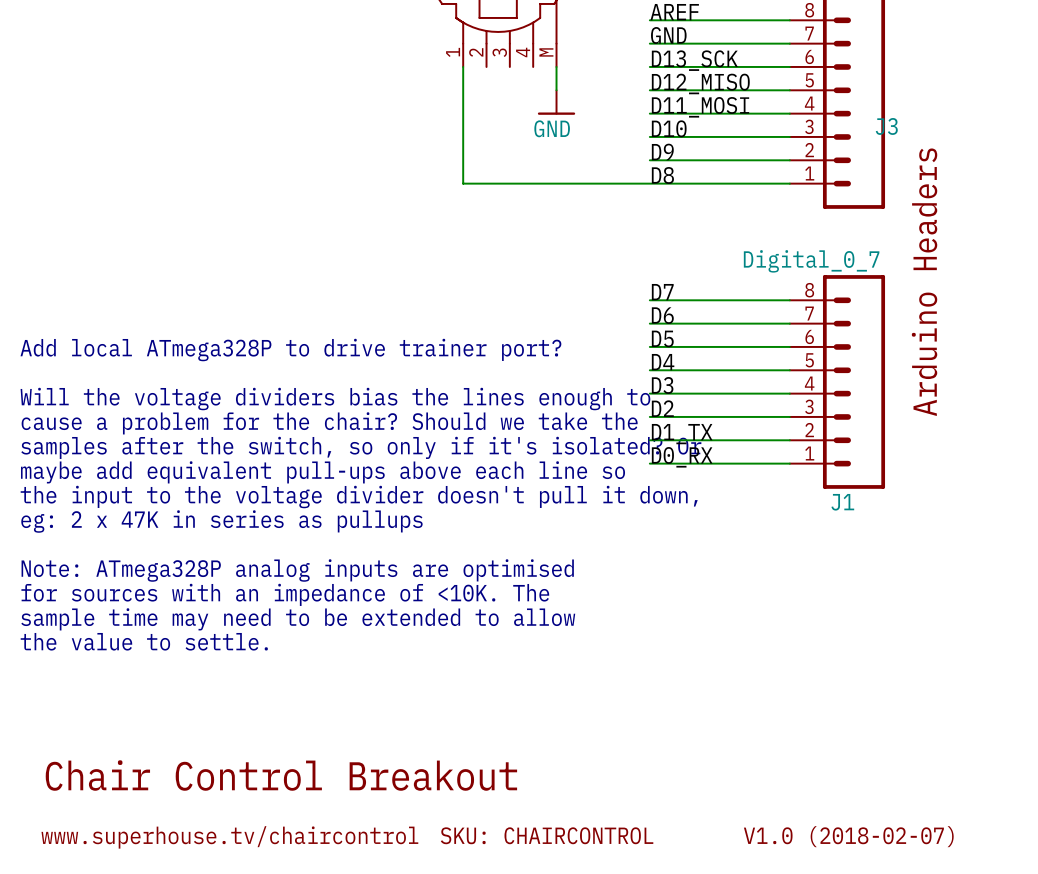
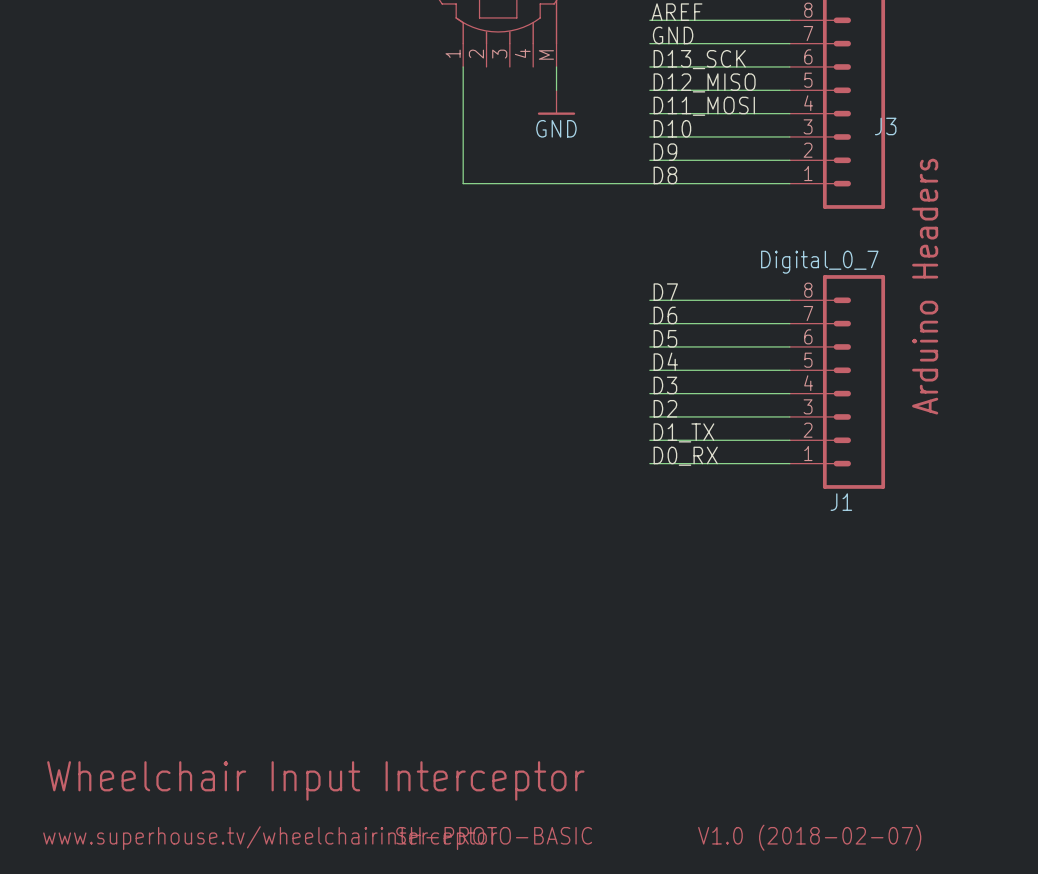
text: Add local ATmega328P to drive trainer port? (290, 350) -> none
text: Will the voltage dividers bias the lines enough to (335, 399) -> none
text: cause a problem for the chair? Should we take the (329, 423) -> none
text: samples after the switch, so only if it's isolated? Or (361, 447) -> none
text: maybe add equivalent pull-ups above each line so (323, 472) -> none
text: the input to the voltage divider doesn't pull it down, (359, 497) -> none
text: eg: 2 x 47K in series as pullups (221, 521) -> none
text: Note: ATmega328P analog inputs are optimised (297, 570) -> none
text: for sources with an impedance of <10K. The (285, 594) -> none
text: sample time may need to be extended to allow (298, 619) -> none
text: the value to settle. (144, 641) -> none
text: Chair Control Breakout (281, 775) -> Wheelchair Input Interceptor (315, 780)
text: none -> SH-PROTO-BASIC (494, 835)
text: SKU: CHAIRCONTROL (547, 835) -> none
text position: V1.0 (2018-02-07) (848, 836) -> V1.0 (2018-02-07) (809, 837)
text: www.superhouse.tv/chaircontrol (229, 837) -> www.superhouse.tv/wheelchairinterceptor (270, 838)

